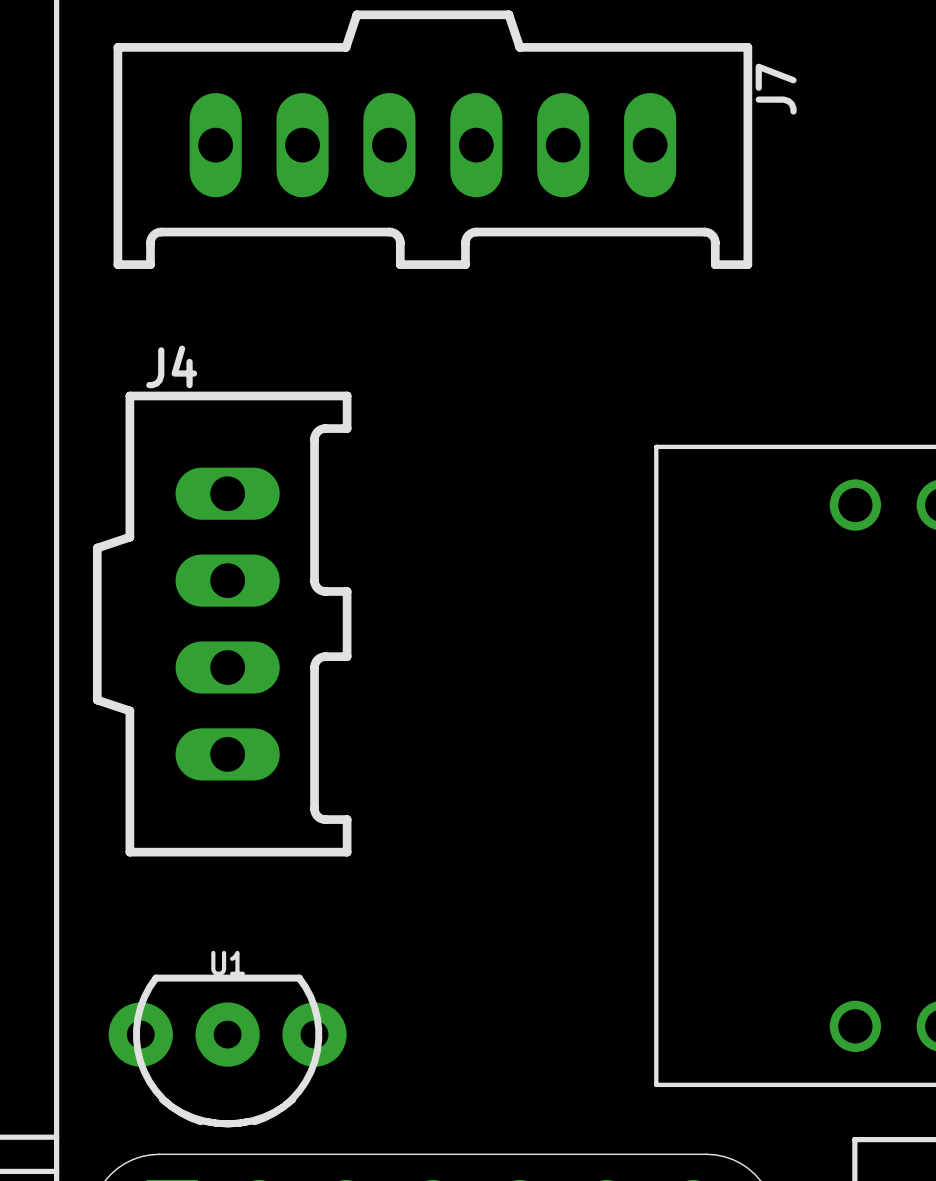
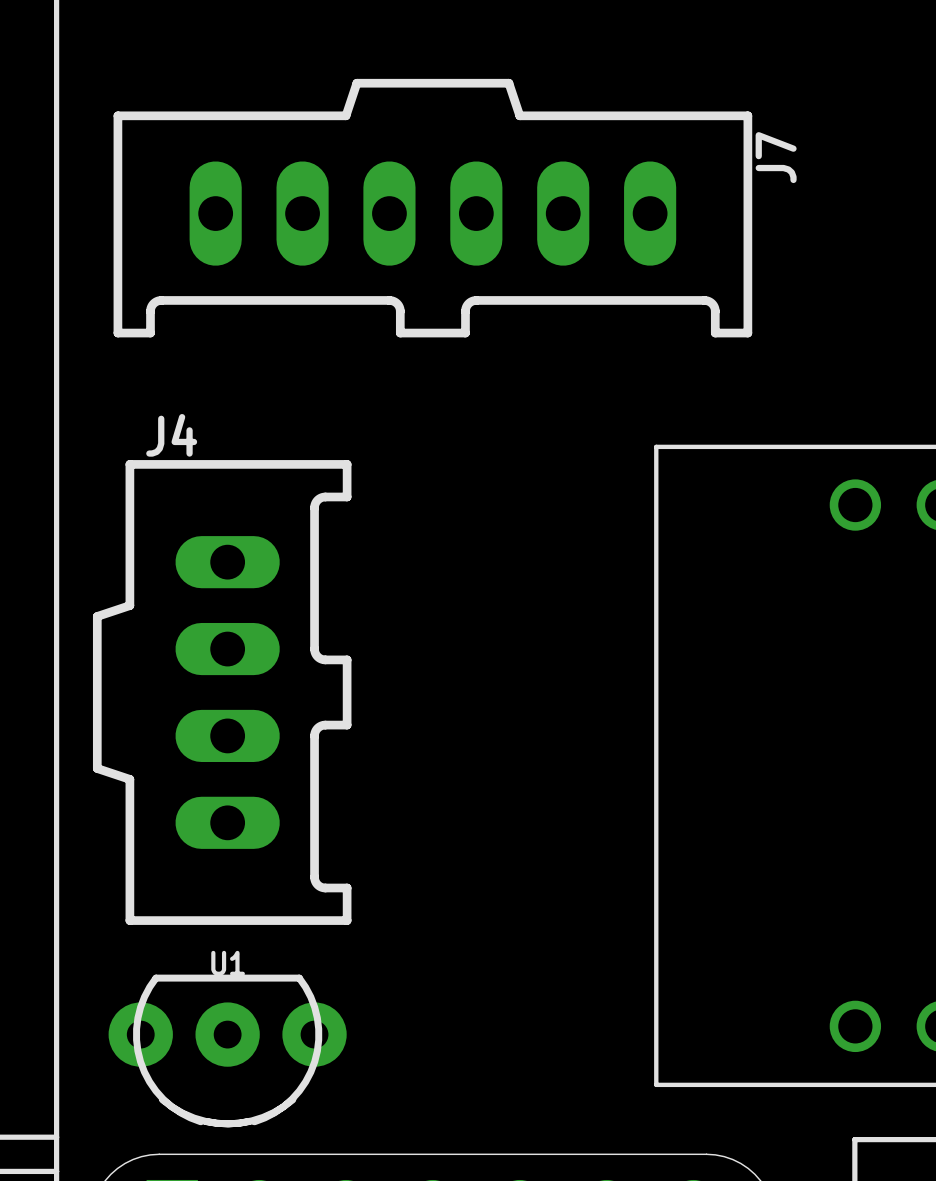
J7 position: (432, 139) -> (432, 208)
J4 position: (222, 624) -> (222, 692)

